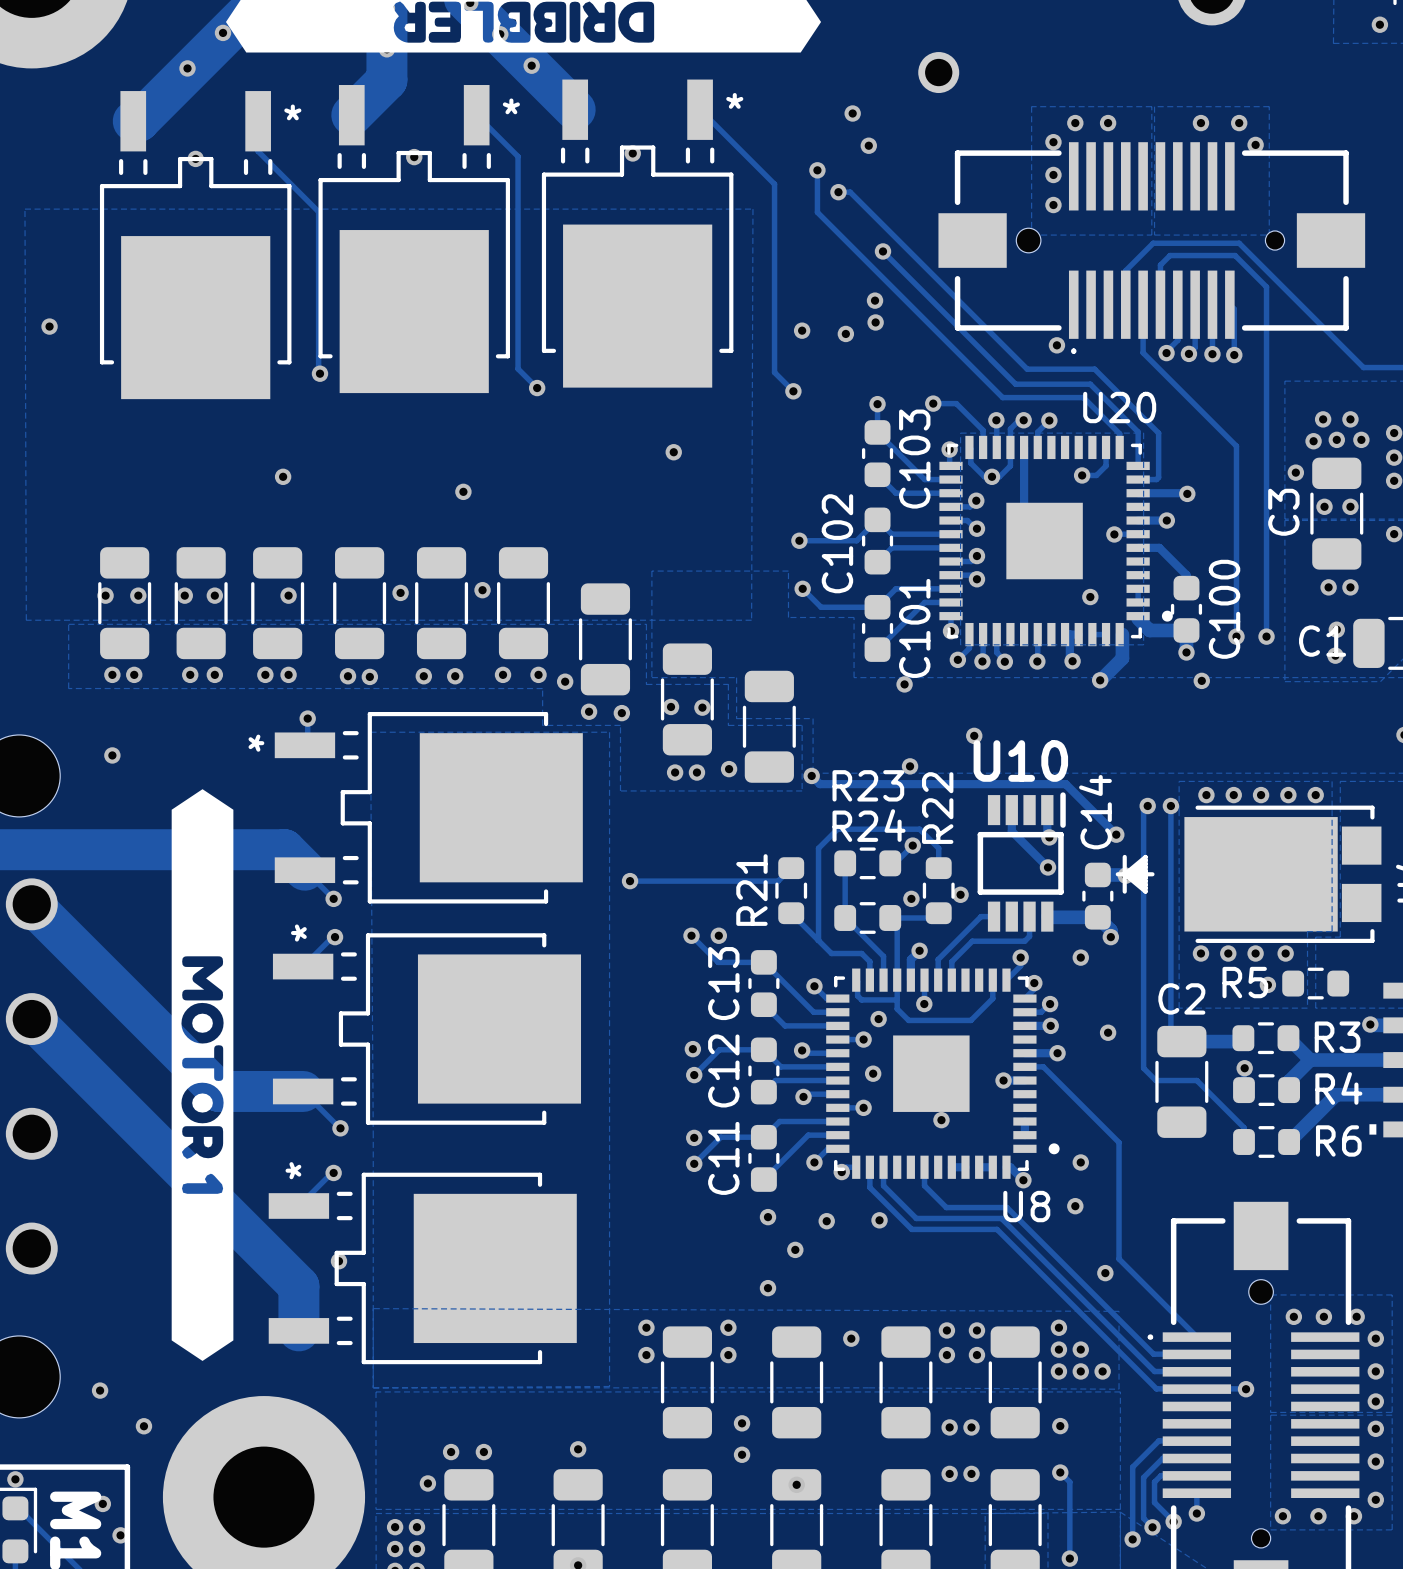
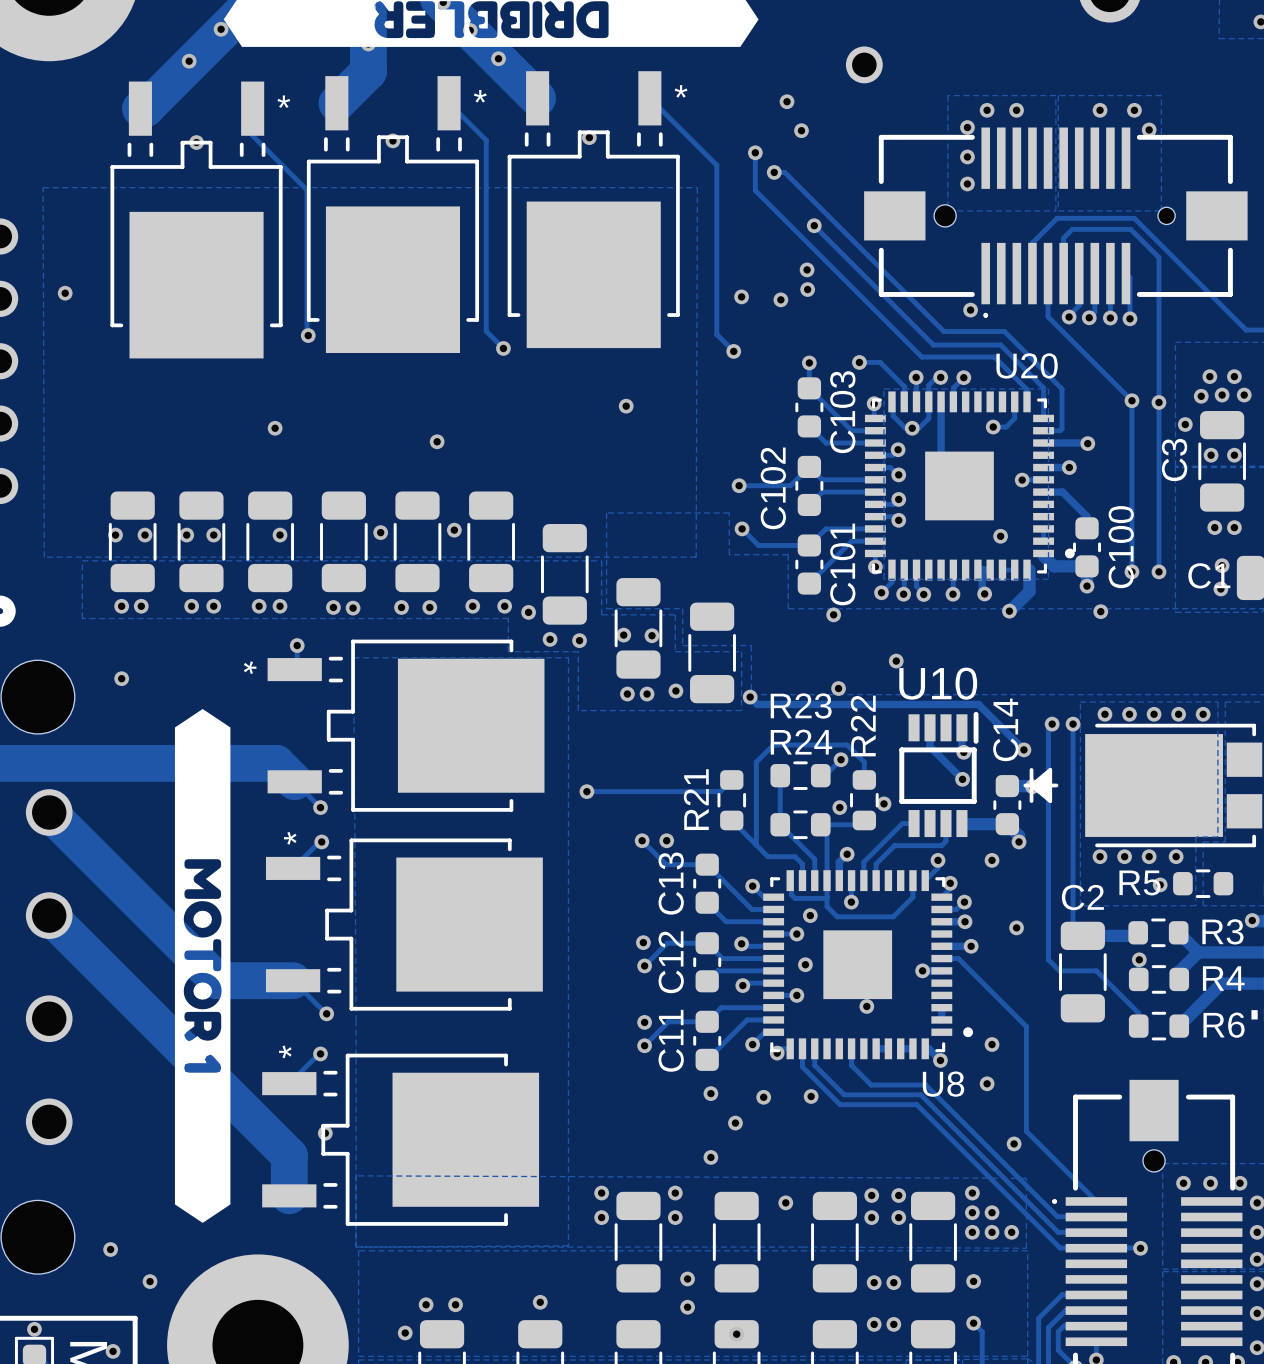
via: none -> (1131, 400)
via: none -> (1158, 402)

